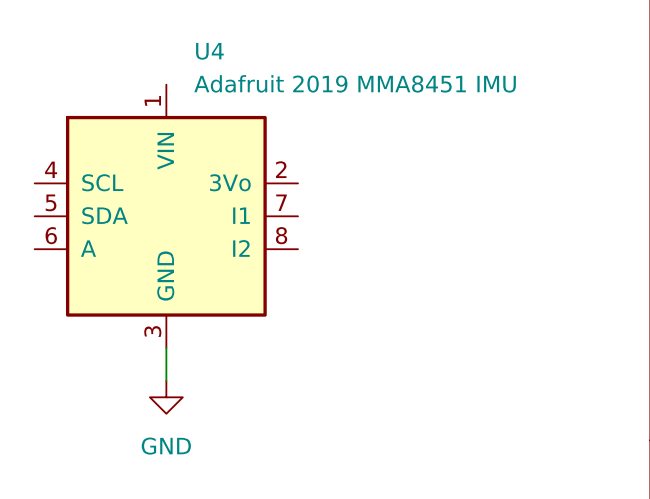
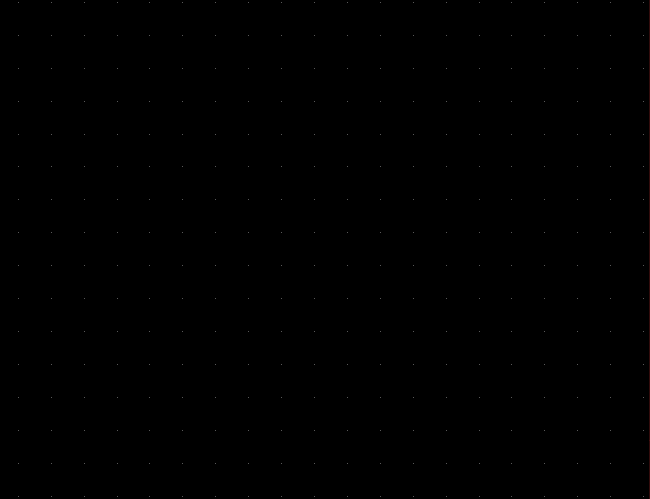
U4: Adafruit 2019 MMA8451 IMU (166, 216) -> none
wire: (166, 347) (166, 380) -> none
power symbol: GND (166, 397) -> none

